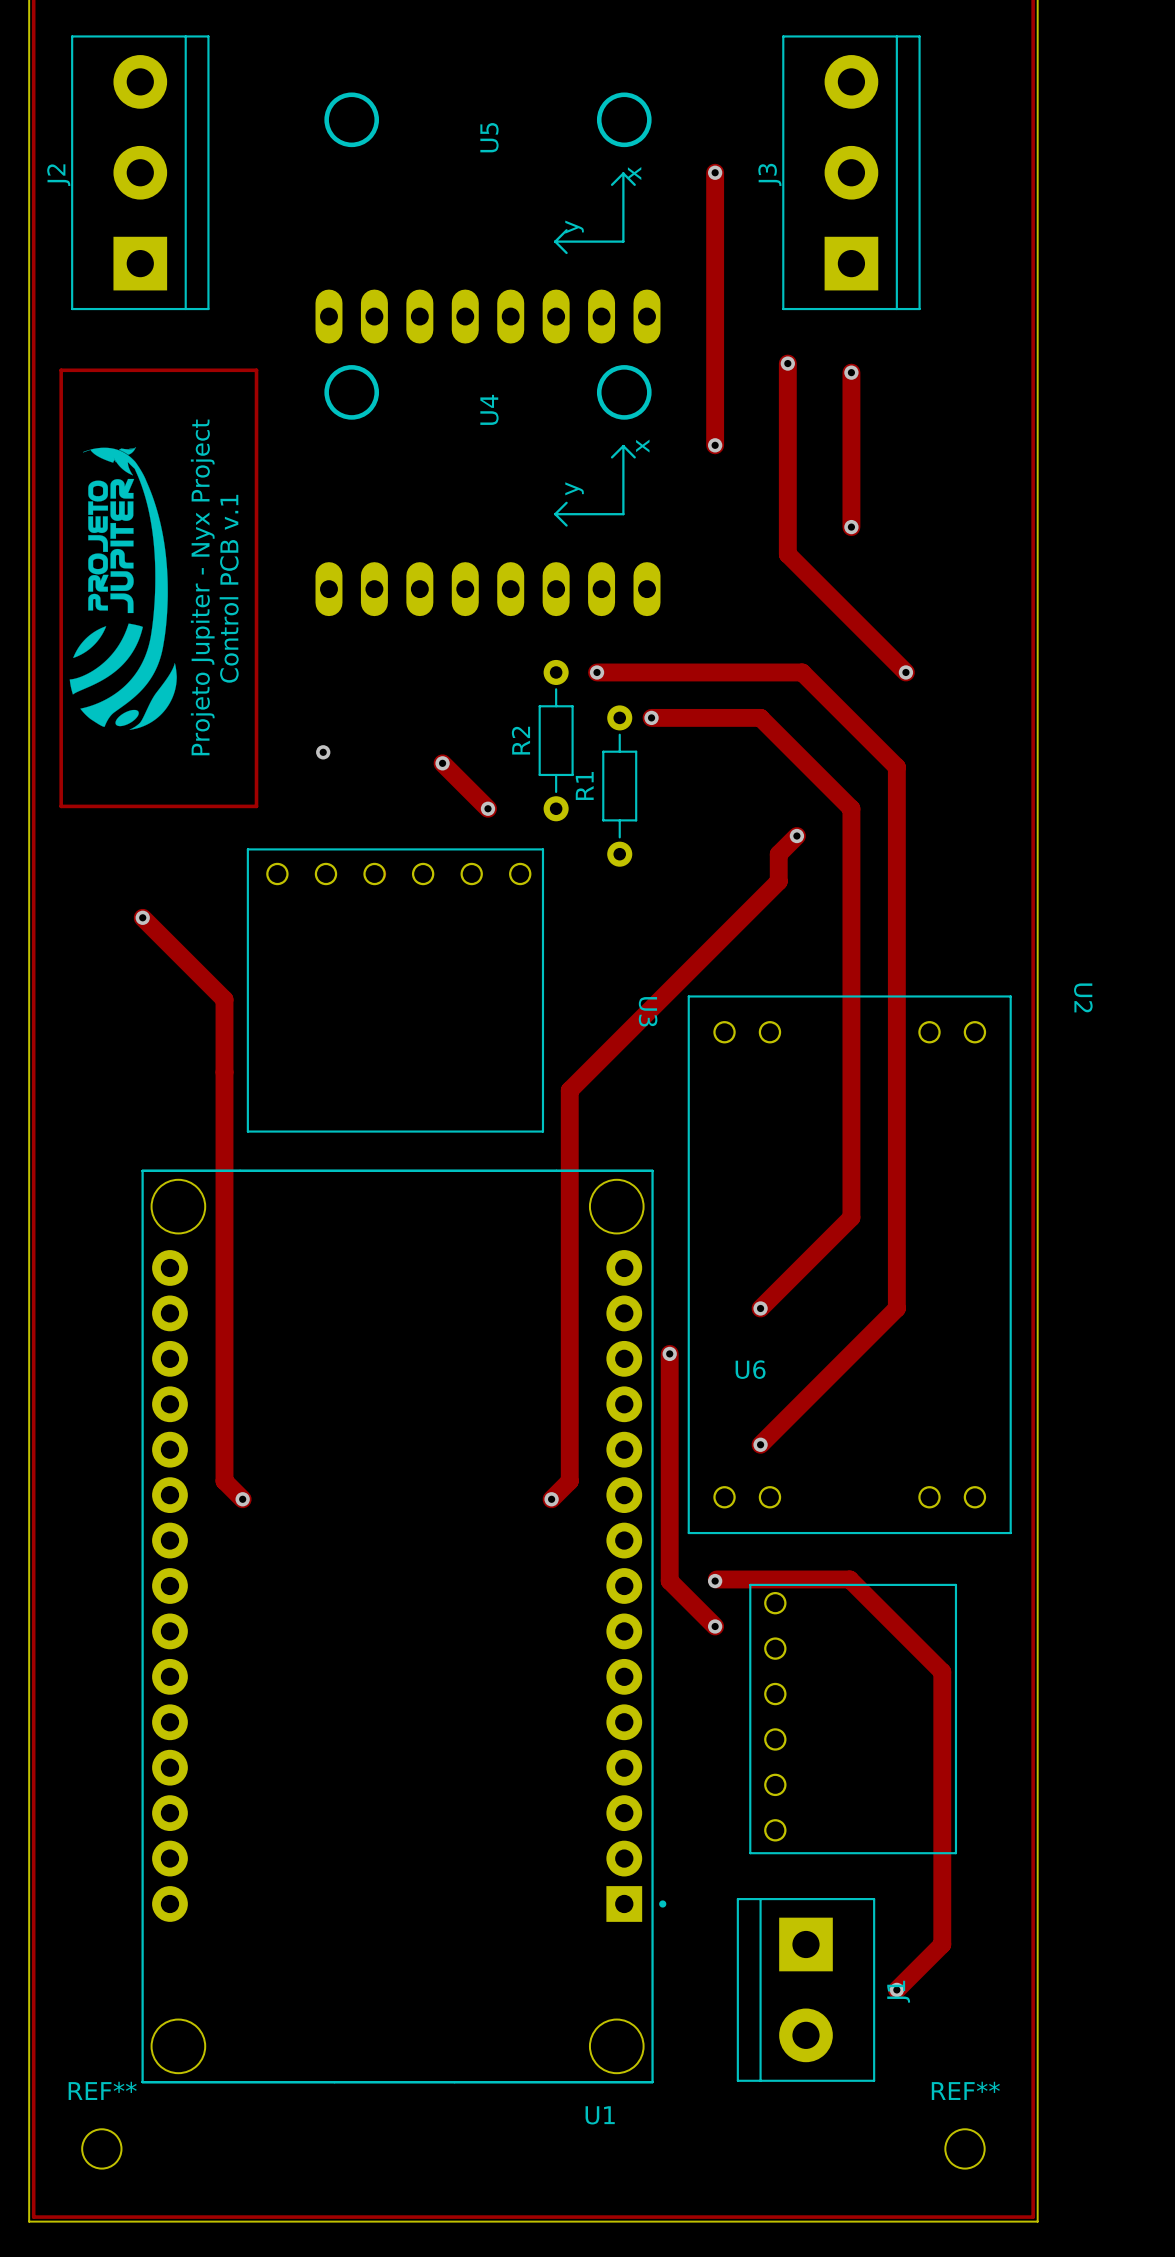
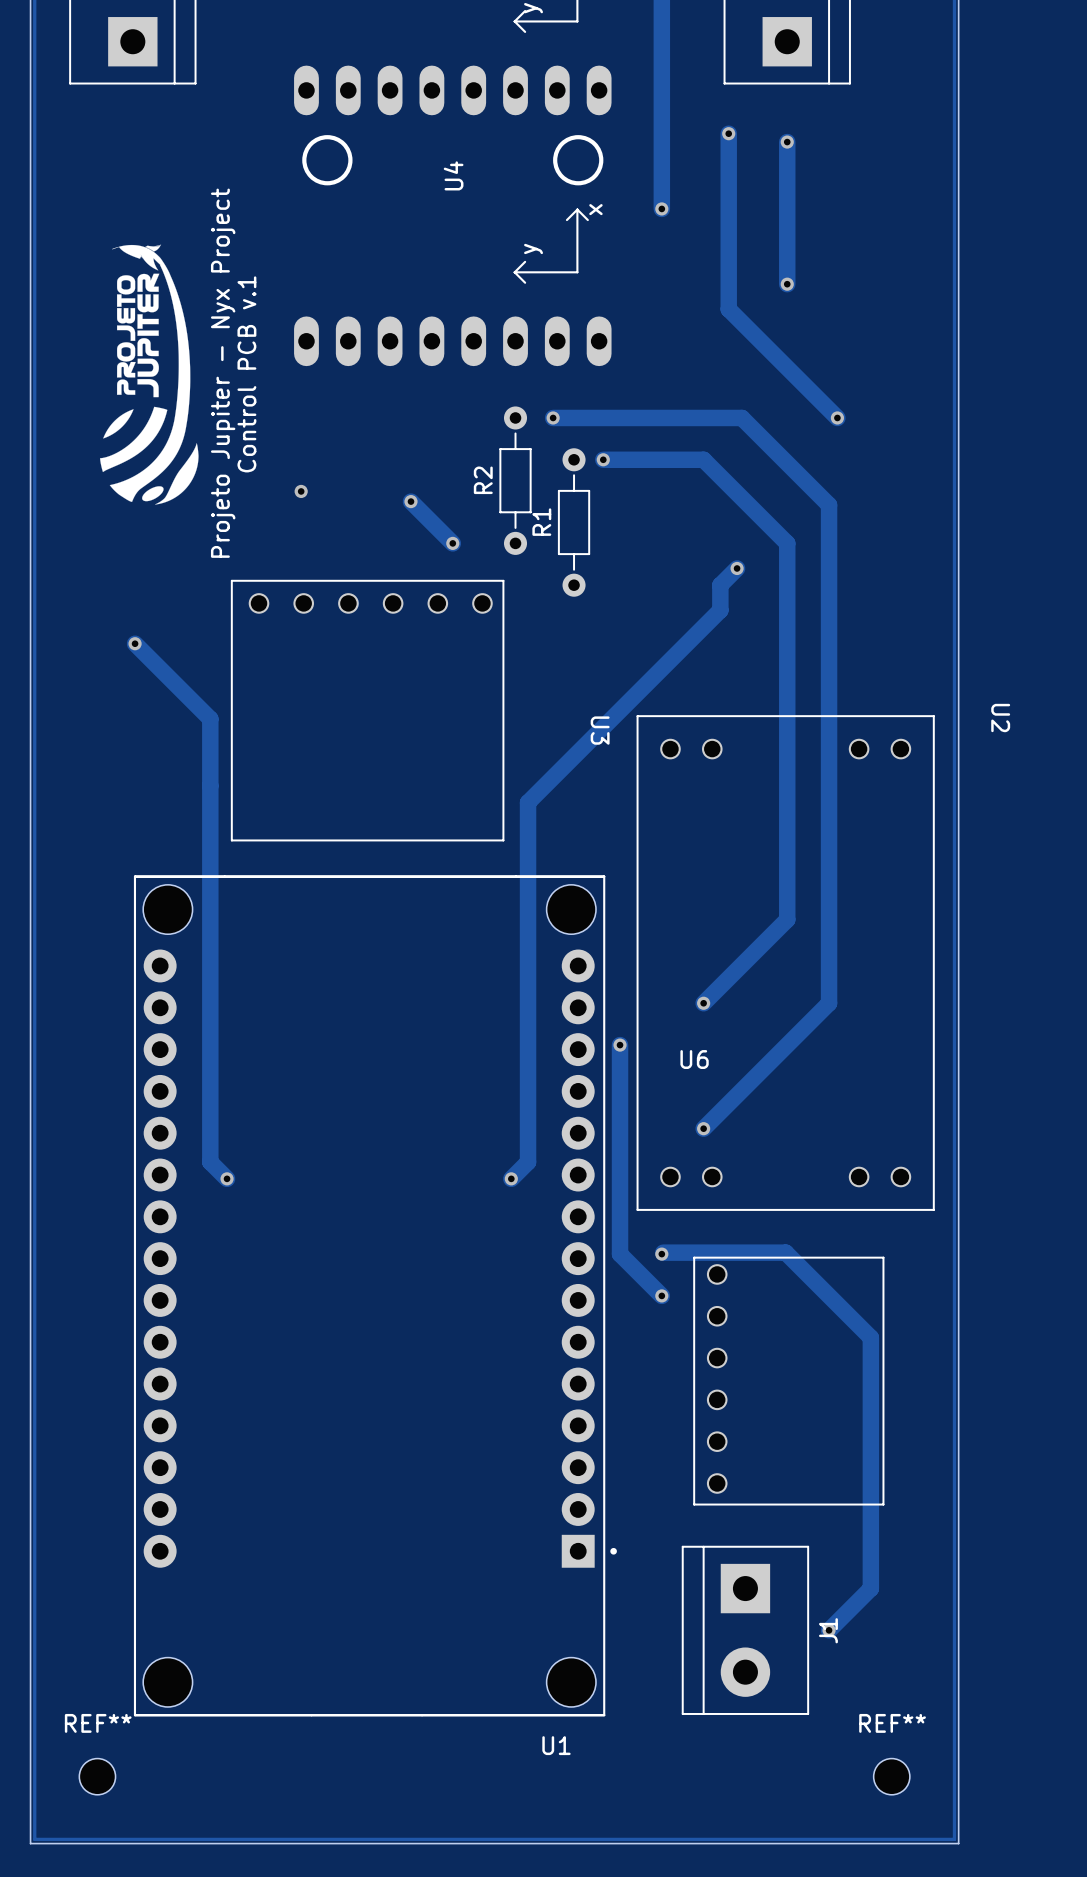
track: (61, 370) (256, 370) (256, 806) (61, 806) (61, 370) -> none
text position: Projeto Jupiter - Nyx Project (202, 587) -> Projeto Jupiter - Nyx Project (223, 373)
drawing position: (123, 588) -> (149, 374)
text position: Control PCB v.1 (229, 588) -> Control PCB v.1 (246, 374)

